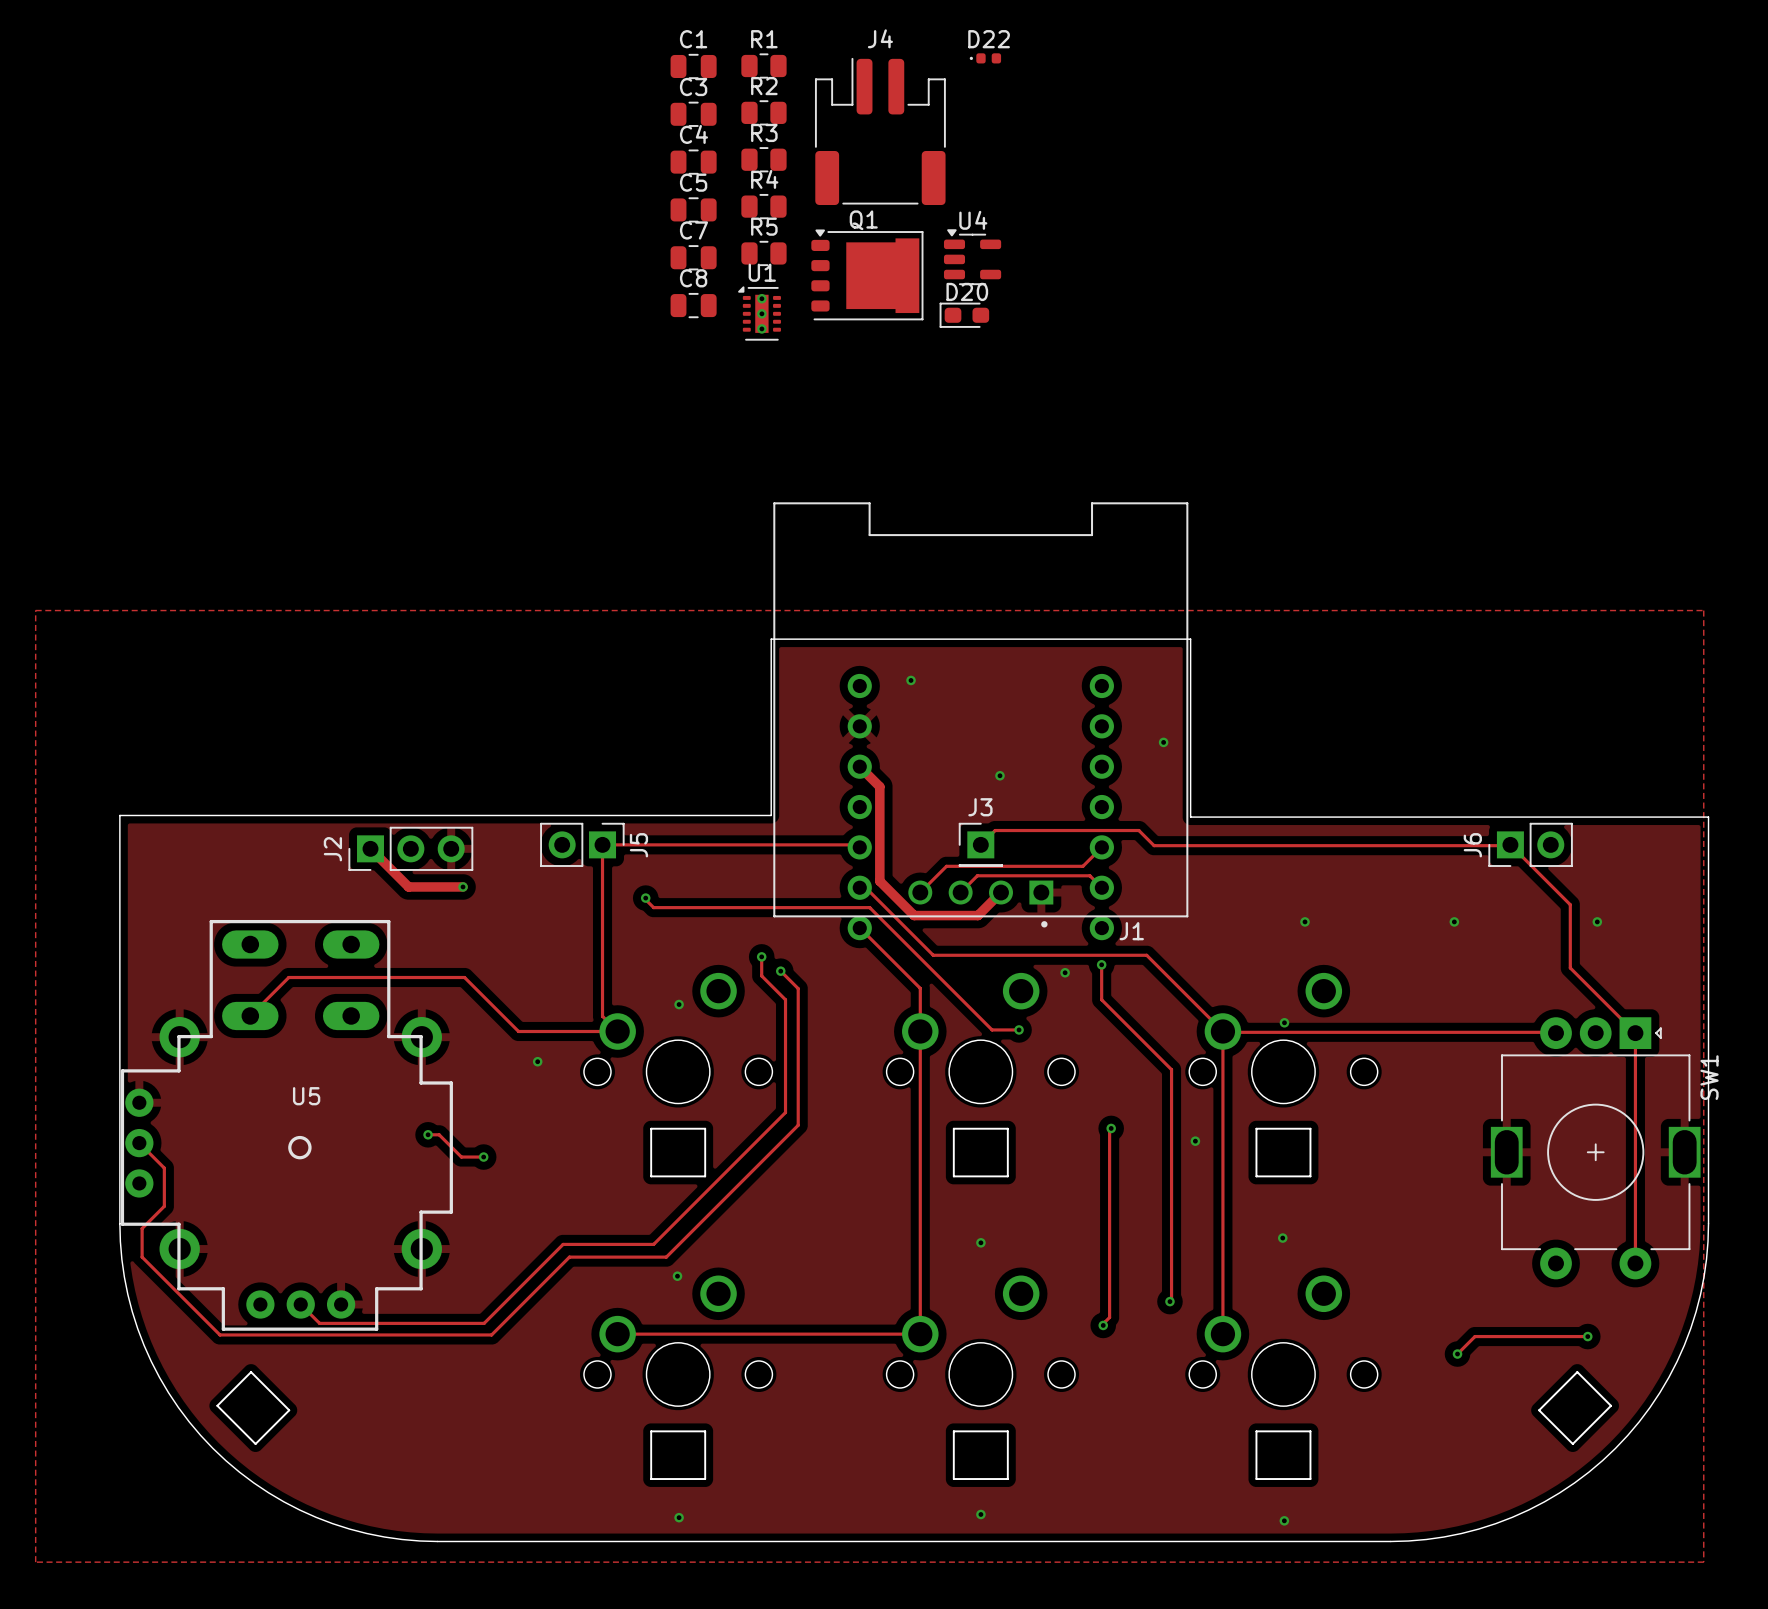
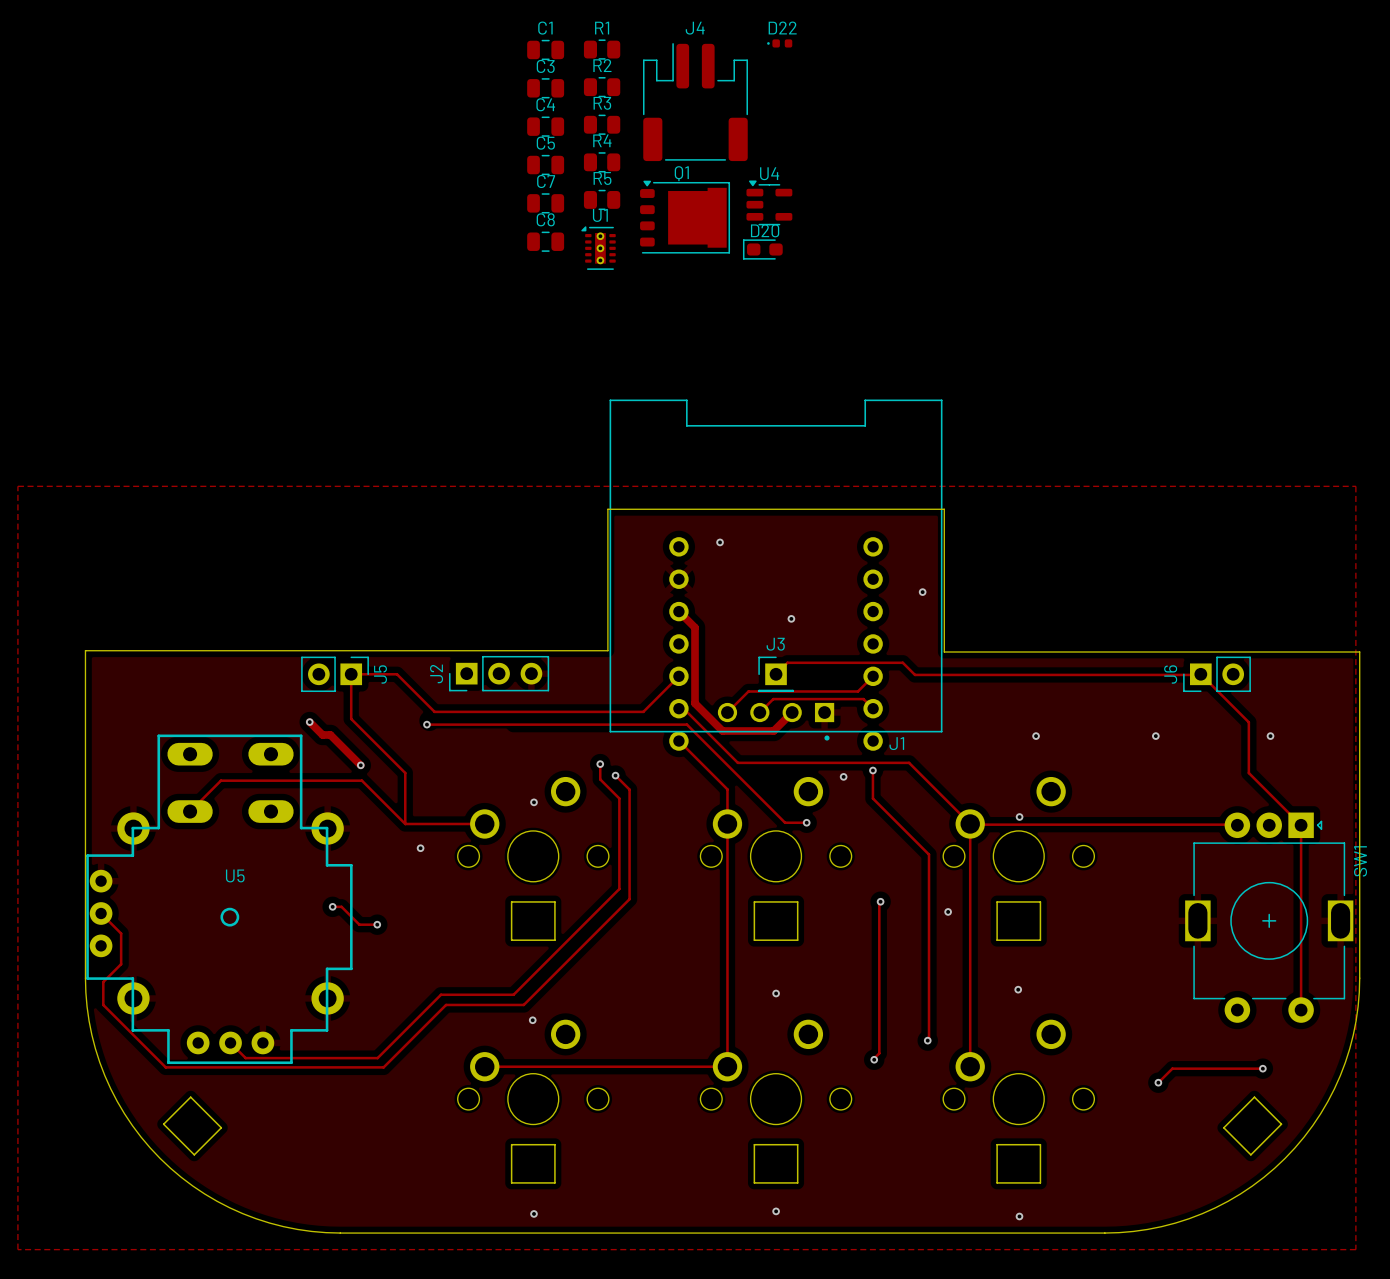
J5 position: (582, 844) -> (335, 674)
track: (859, 847) (857, 844) (602, 844) (602, 1016) (617, 1031) -> (678, 676) (643, 711) (434, 711) (397, 674) (351, 674) (351, 718) (405, 773) (405, 823)
track: (370, 848) (408, 886) (463, 886) -> none
J2 position: (410, 848) -> (499, 673)
via: (463, 886) -> none
track: (645, 898) (653, 907) -> (426, 724) (513, 724)
via: (645, 898) -> none
track: none -> (309, 722) (322, 734) (330, 734) (360, 765)
via: none -> (309, 722)
via: none -> (426, 724)
via: none -> (360, 765)

